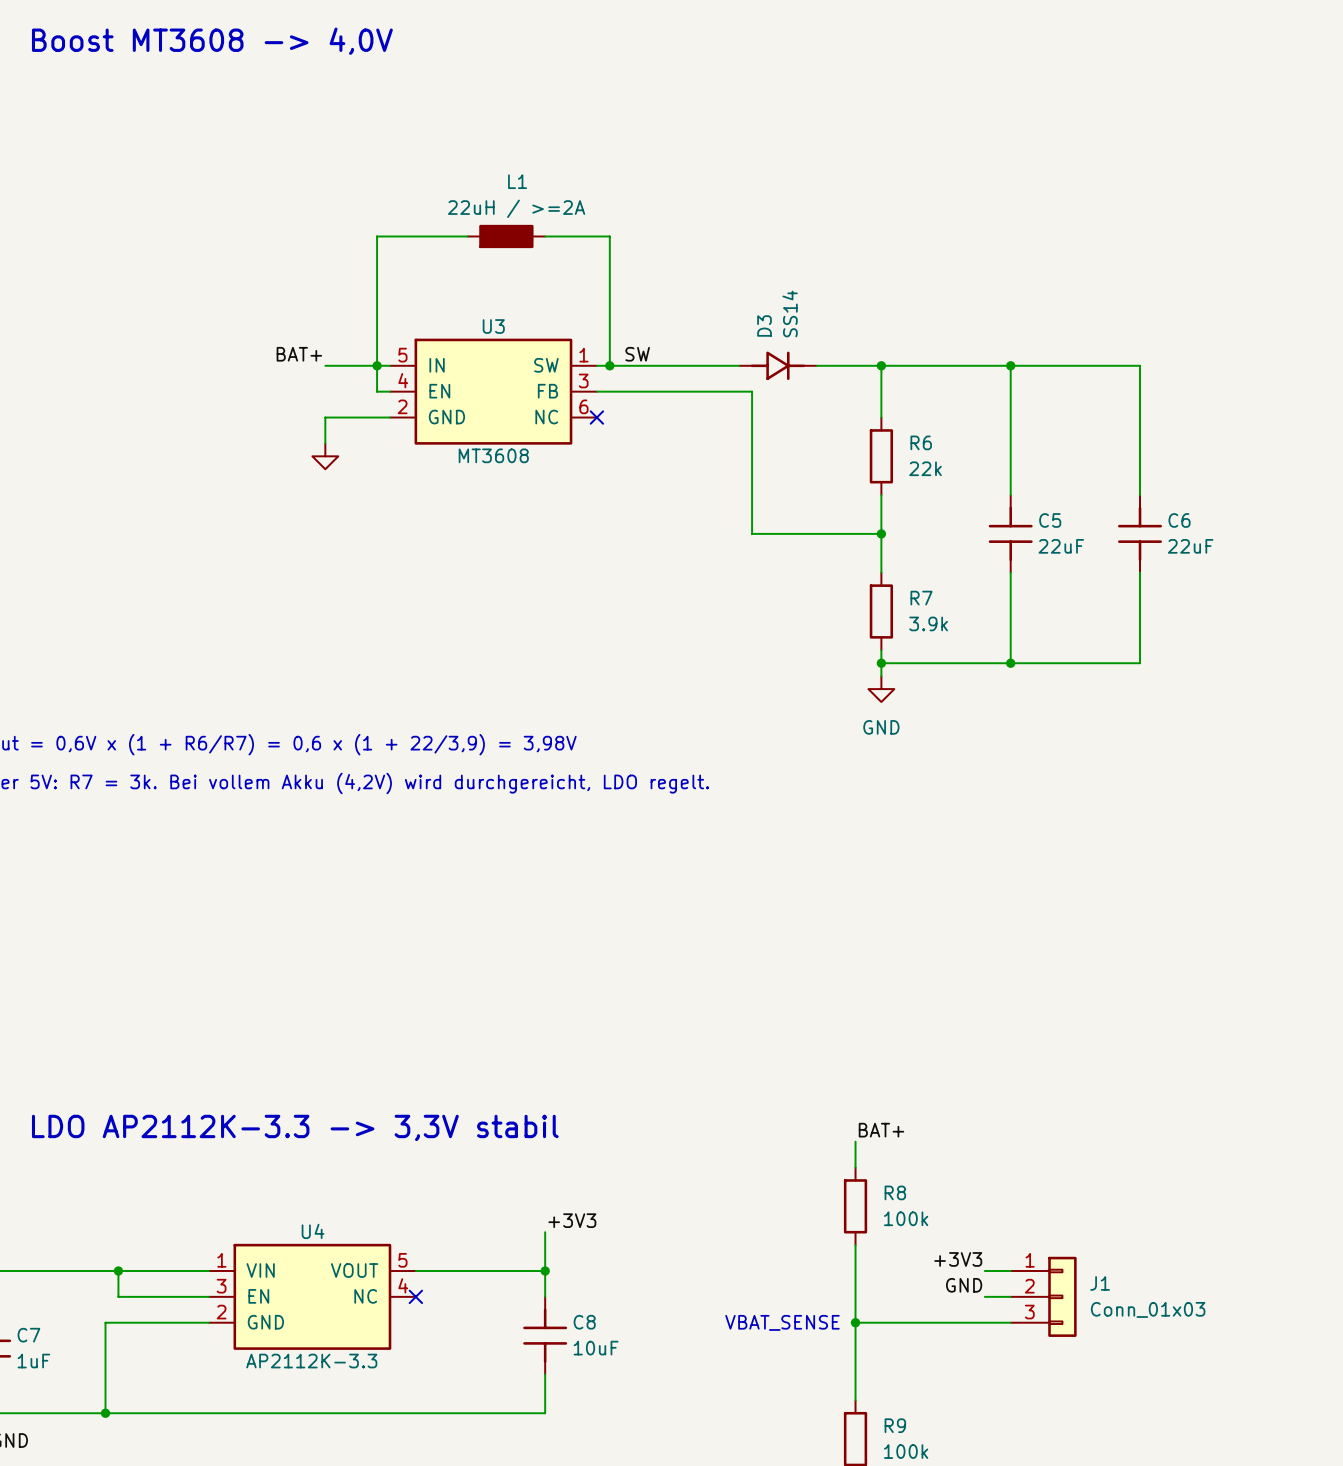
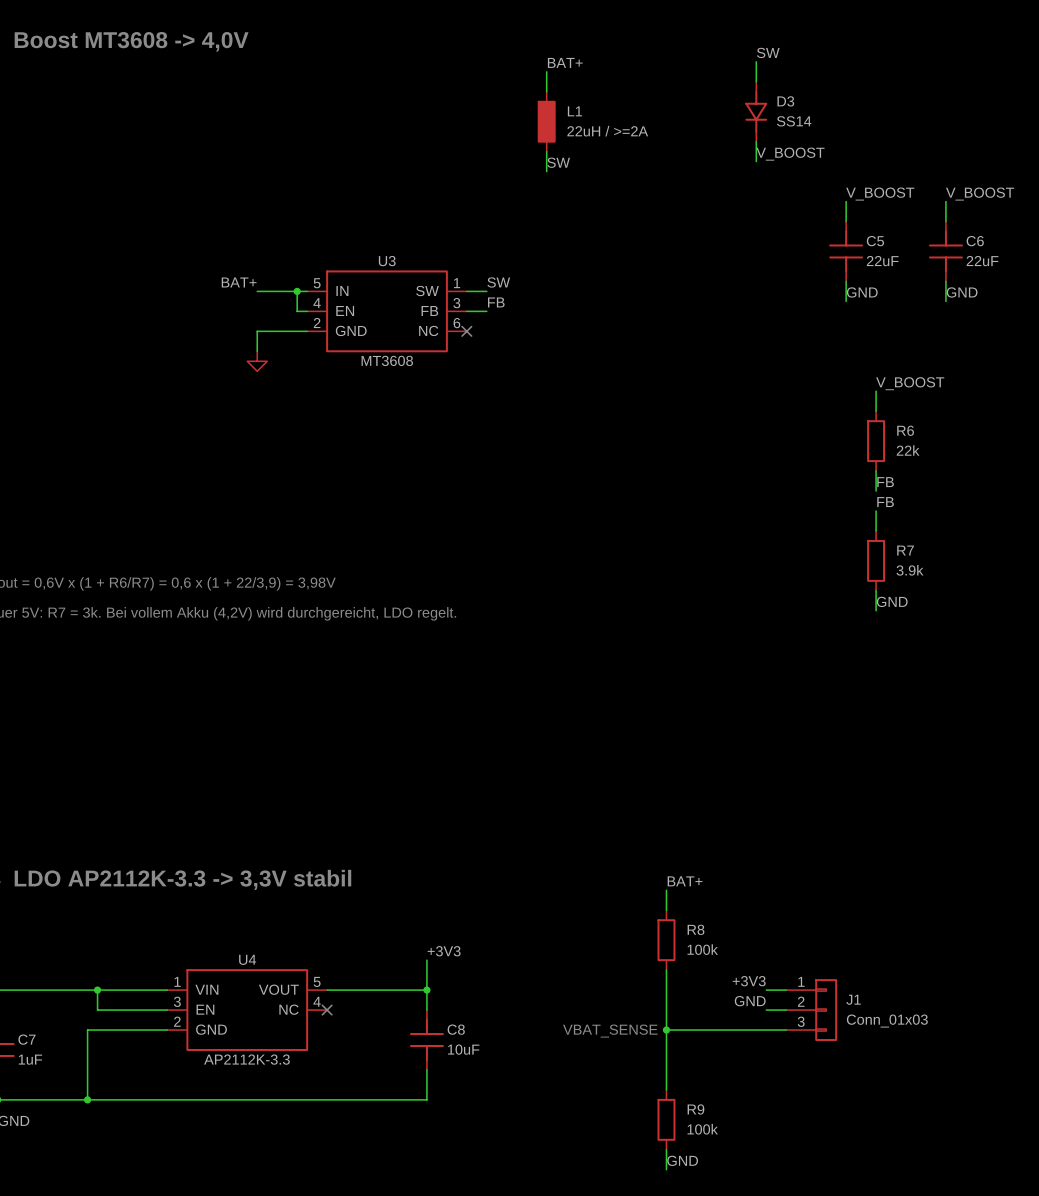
label: none -> SW (768, 52)
wire: none -> (756, 61) (756, 81)
label: none -> BAT+ (565, 62)
wire: none -> (546, 71) (546, 91)
wire: none -> (756, 141) (756, 161)
L1 name position: L1 (517, 181) -> L1 (574, 111)
wire: none -> (546, 151) (546, 171)
label: none -> V_BOOST (790, 154)
label: none -> SW (558, 162)
L1 value position: 22uH / >=2A (516, 208) -> 22uH / >=2A (607, 131)
wire: (467, 236) (377, 236) (377, 365) -> none
L1 rotation: 0° (506, 236) -> 90° clockwise (546, 121)
L1 position: (506, 236) -> (546, 121)
wire: (545, 236) (609, 236) (609, 365) -> none
label: none -> V_BOOST (880, 194)
label: none -> V_BOOST (980, 194)
wire: none -> (846, 201) (846, 221)
wire: none -> (945, 201) (945, 221)
wire: none -> (846, 281) (846, 301)
wire: none -> (945, 281) (945, 301)
junction: (609, 365) -> none
wire: (622, 365) (739, 365) -> none
D3 rotation: 0° (777, 365) -> 90° clockwise (756, 111)
D3 position: (777, 365) -> (756, 111)
wire: (816, 365) (1140, 365) (1140, 495) -> none
wire: (881, 365) (881, 417) -> none
junction: (881, 365) -> none
wire: (1010, 365) (1010, 495) -> none
junction: (1010, 365) -> none
label: none -> GND (862, 292)
label: none -> GND (962, 292)
label: none -> FB (496, 302)
wire: (622, 391) (752, 391) (752, 533) (881, 533) -> none
R6 position: (881, 456) -> (876, 441)
label: none -> V_BOOST (910, 383)
wire: (881, 495) (881, 572) -> none
wire: none -> (876, 391) (876, 411)
junction: (881, 533) -> none
C5 position: (1010, 533) -> (846, 251)
C6 position: (1140, 533) -> (945, 251)
wire: (1010, 572) (1010, 663) -> none
wire: (1140, 572) (1140, 663) (881, 663) -> none
wire: none -> (876, 471) (876, 491)
R7 position: (881, 611) -> (876, 560)
label: none -> FB (885, 482)
label: none -> FB (885, 502)
wire: (881, 650) (881, 676) -> (876, 510) (876, 530)
junction: (881, 663) -> none
junction: (1010, 663) -> none
power symbol: GND (881, 689) -> none
wire: none -> (876, 590) (876, 610)
label: none -> GND (892, 601)

